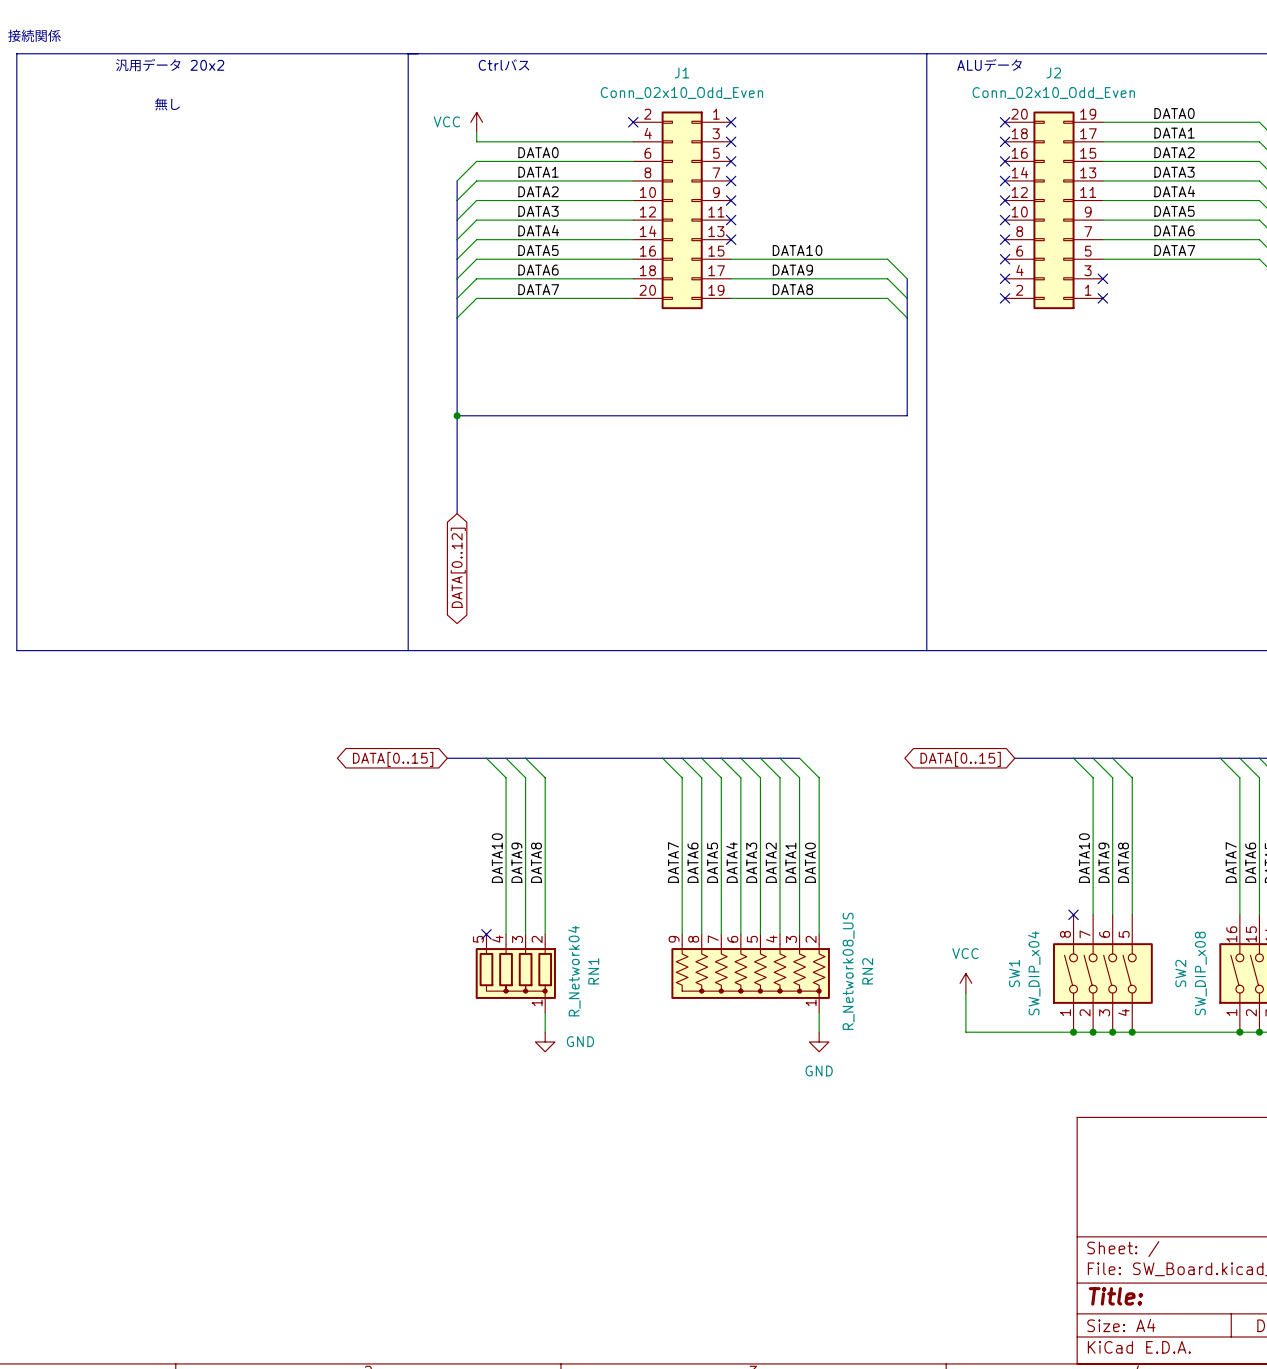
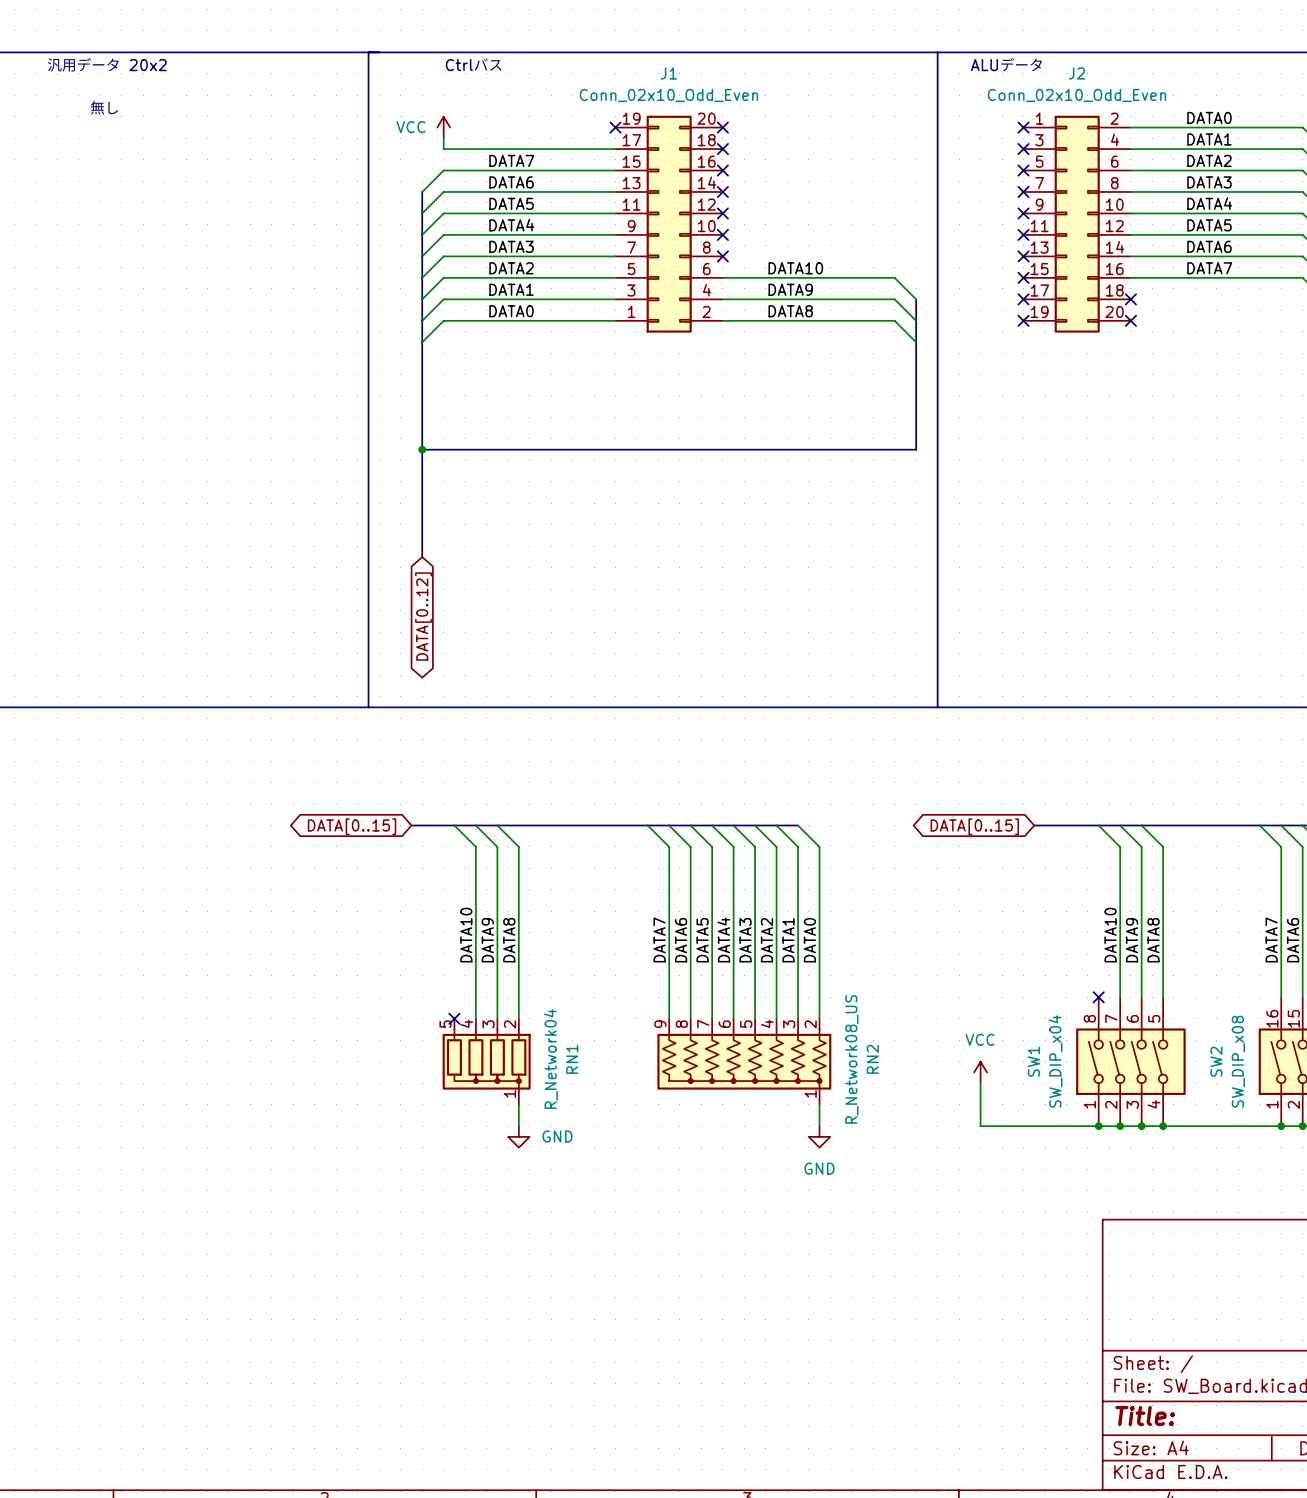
label: DATA0 (538, 152) -> DATA7 (511, 160)
label: DATA1 (538, 172) -> DATA6 (511, 182)
label: DATA2 (538, 191) -> DATA5 (511, 203)
J1 rotation: 0° (682, 210) -> 180° (669, 224)
J2 rotation: 0° (1053, 210) -> 180° (1077, 224)
label: DATA3 (538, 211) -> DATA4 (511, 225)
label: DATA4 (538, 230) -> DATA3 (511, 246)
label: DATA5 (538, 250) -> DATA2 (511, 268)
label: DATA6 (538, 270) -> DATA1 (511, 289)
label: DATA7 (538, 289) -> DATA0 (511, 311)

